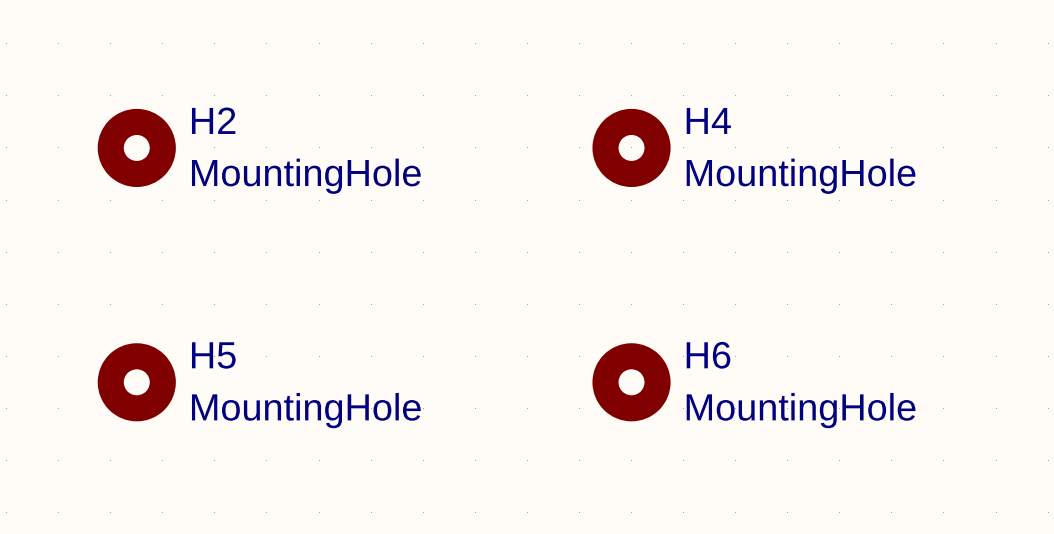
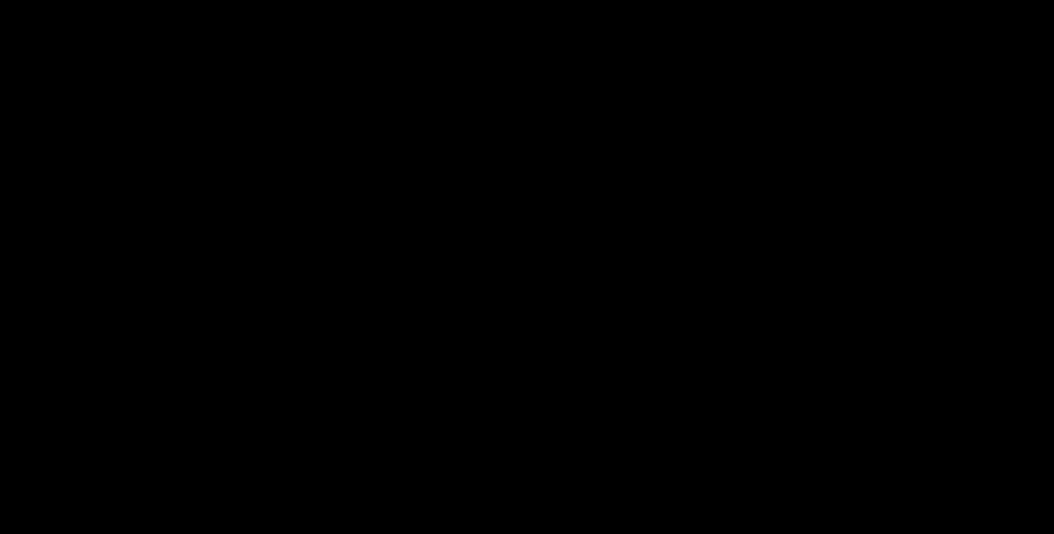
H2: MountingHole (136, 147) -> none
H4: MountingHole (631, 147) -> none
H5: MountingHole (136, 382) -> none
H6: MountingHole (631, 382) -> none

